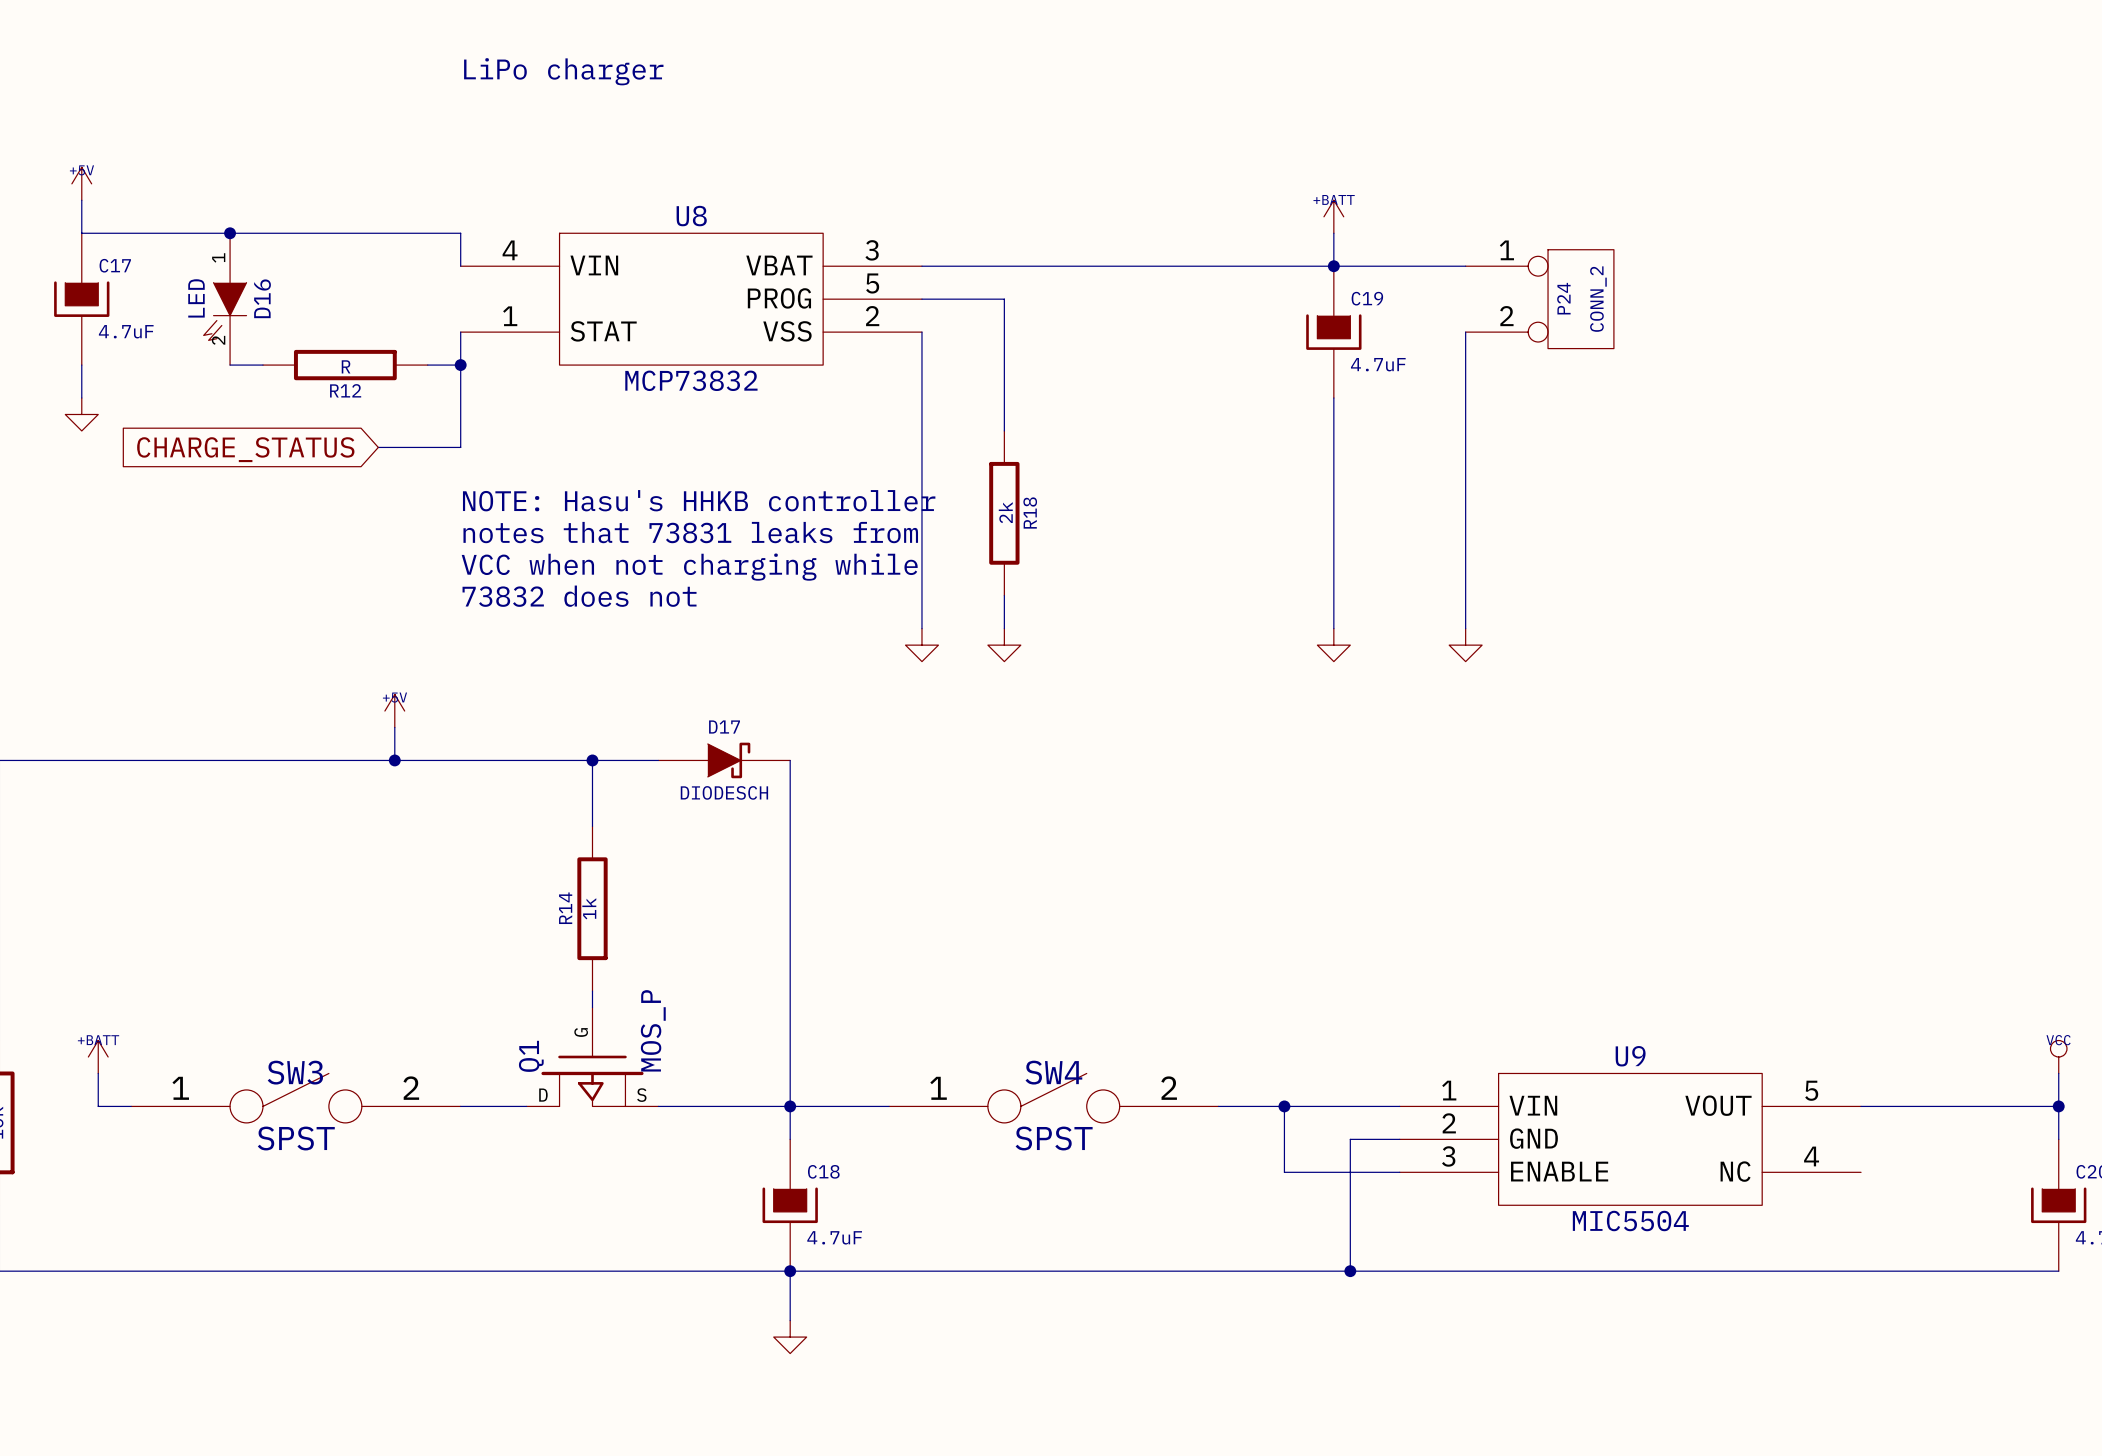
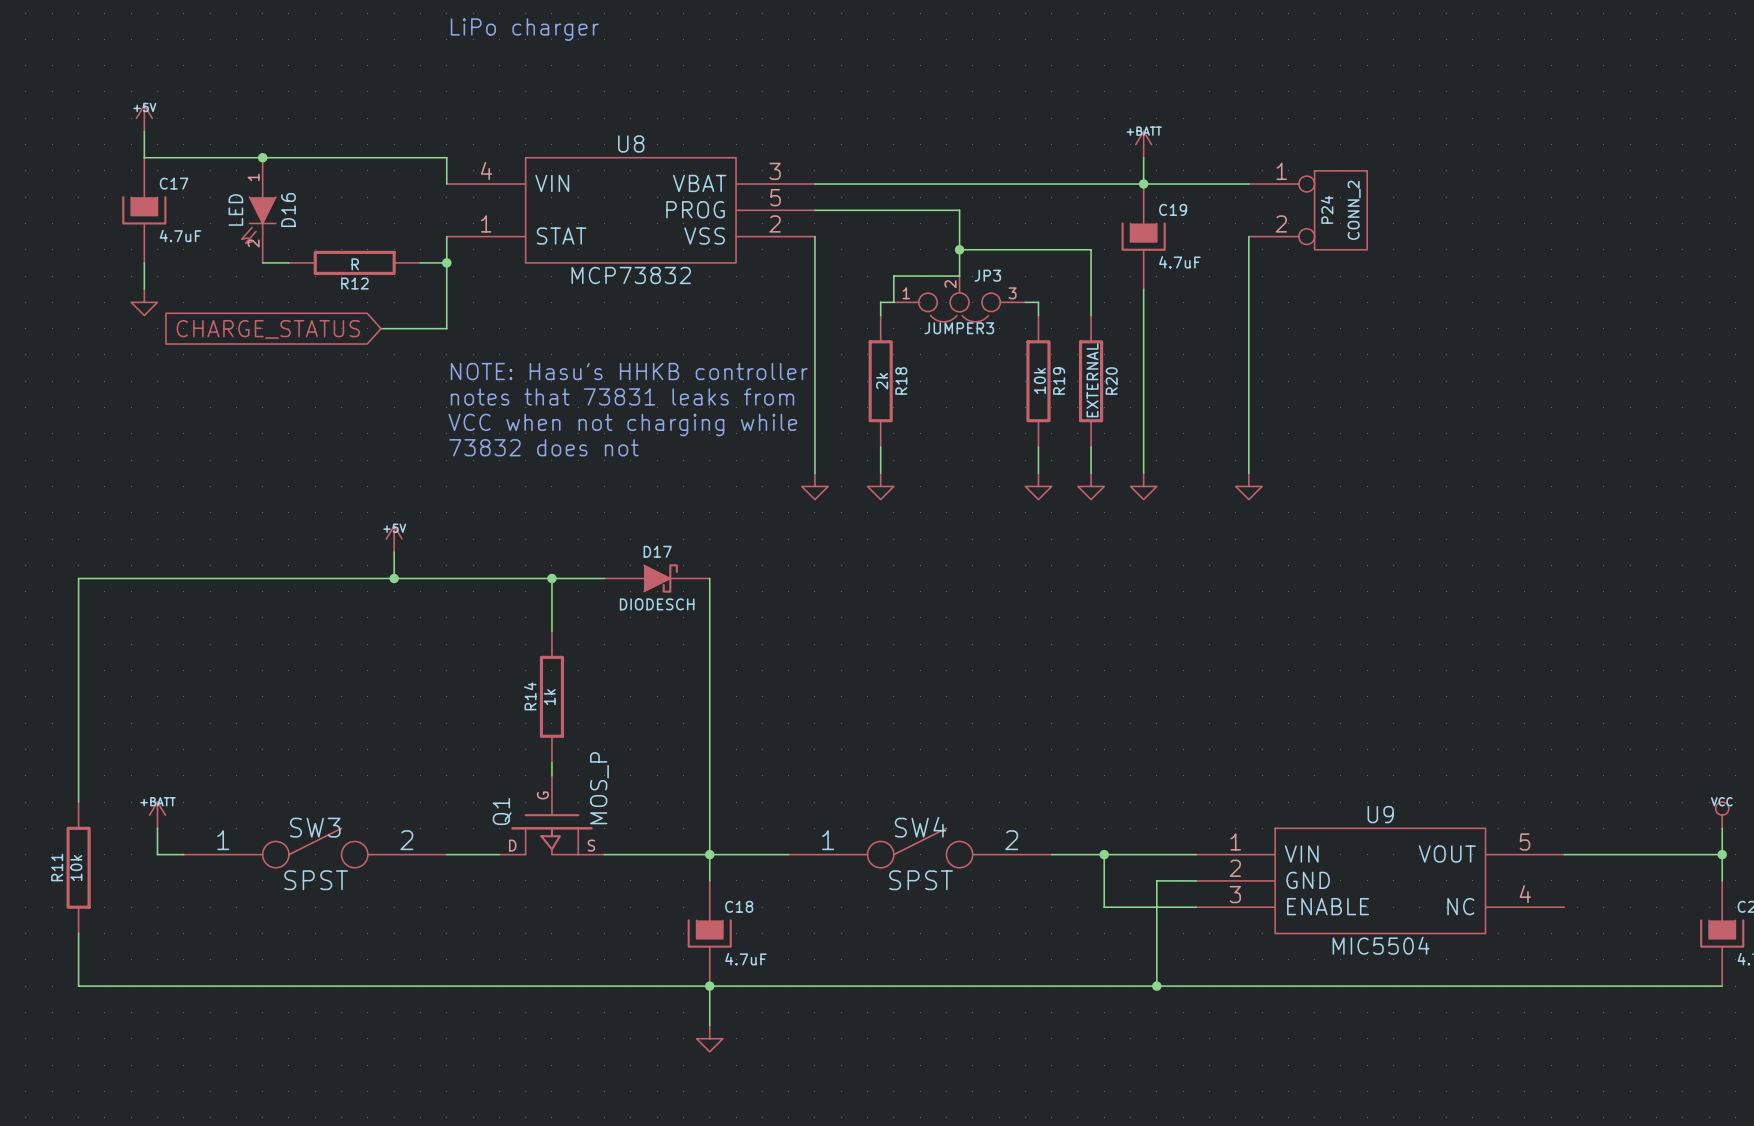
wire: (1004, 299) (1004, 414) -> (880, 210) (959, 210) (959, 276) (893, 276) (893, 302) (880, 302)
wire: none -> (959, 249) (1091, 249) (1091, 315)
junction: none -> (959, 249)
JP3: none -> JUMPER3 (959, 298)
wire: none -> (1025, 302) (1038, 302) (1038, 315)
R19: none -> 10k (1038, 381)
R20: none -> EXTERNAL (1091, 381)
wire: none -> (1038, 447) (1038, 473)
wire: none -> (1091, 447) (1091, 473)
power symbol: none -> (1038, 486)
power symbol: none -> (1091, 486)

